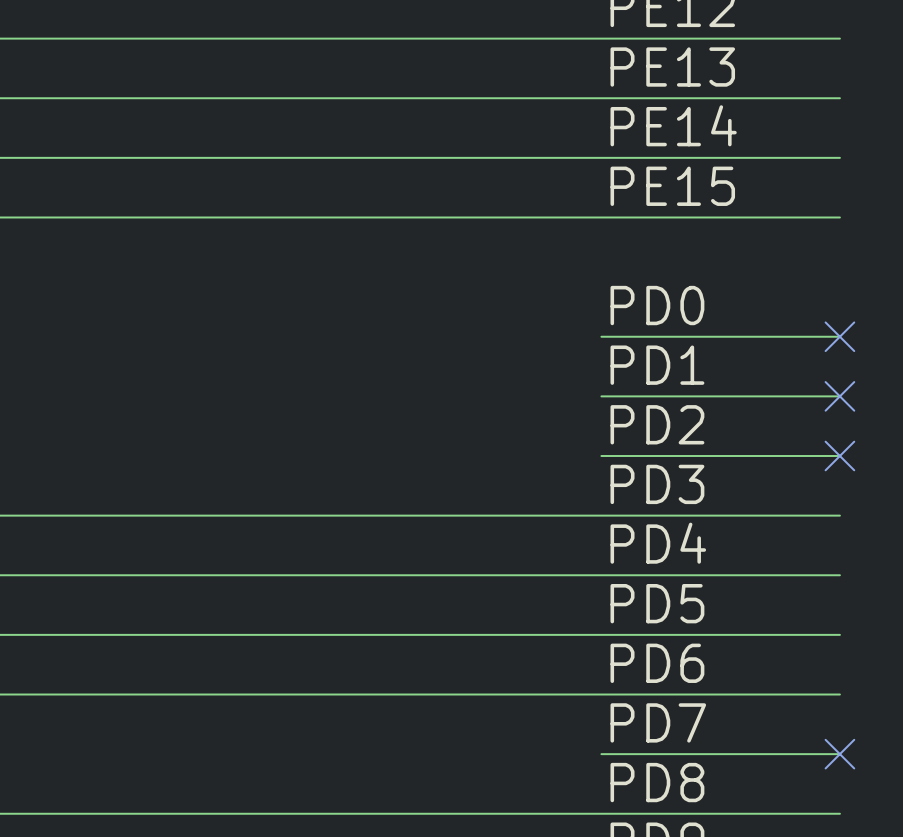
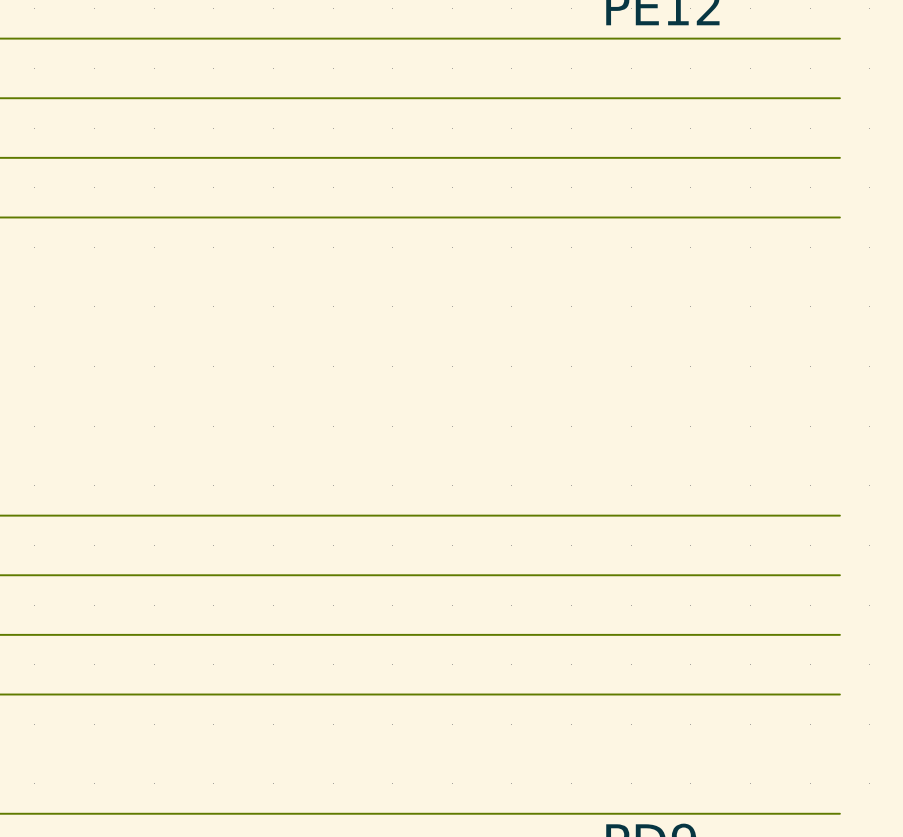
label: PE13 (672, 67) -> none
label: PE14 (673, 125) -> none
label: PE15 (672, 186) -> none
label: PD0 (657, 305) -> none
wire: (601, 336) (839, 336) -> none
no-connect mark: (839, 336) -> none
label: PD1 (657, 365) -> none
wire: (601, 396) (839, 396) -> none
no-connect mark: (839, 396) -> none
label: PD2 (657, 424) -> none
wire: (601, 456) (839, 456) -> none
no-connect mark: (839, 456) -> none
label: PD3 (657, 484) -> none
label: PD4 (658, 543) -> none
label: PD5 (657, 603) -> none
label: PD6 (657, 663) -> none
label: PD7 (658, 722) -> none
wire: (601, 754) (839, 754) -> none
no-connect mark: (839, 754) -> none
label: PD8 (657, 782) -> none

